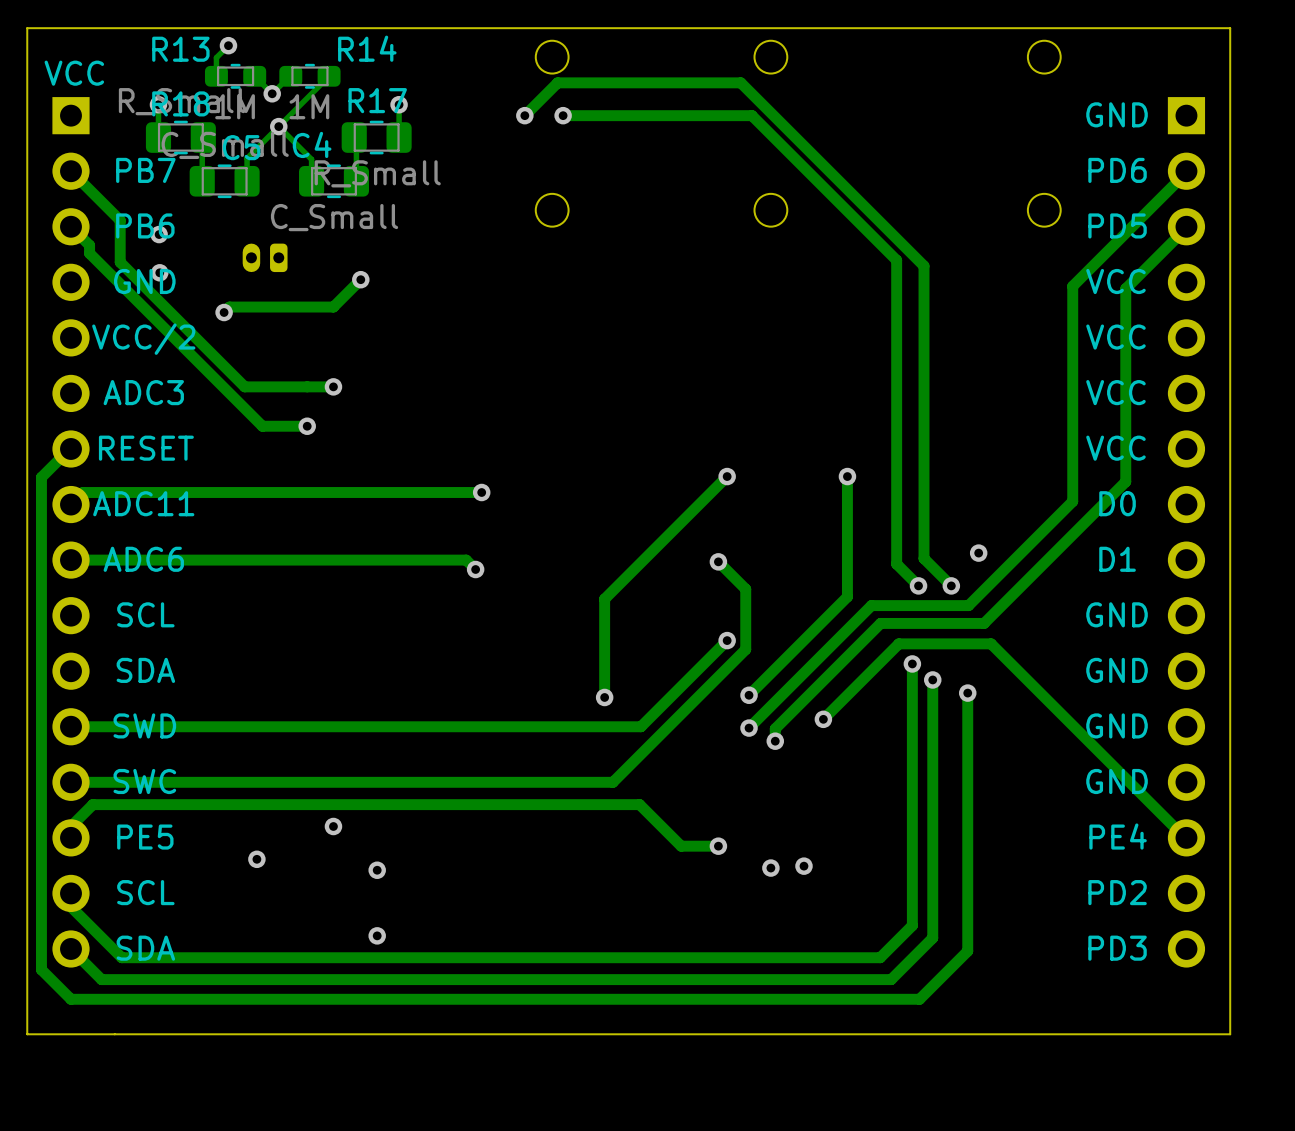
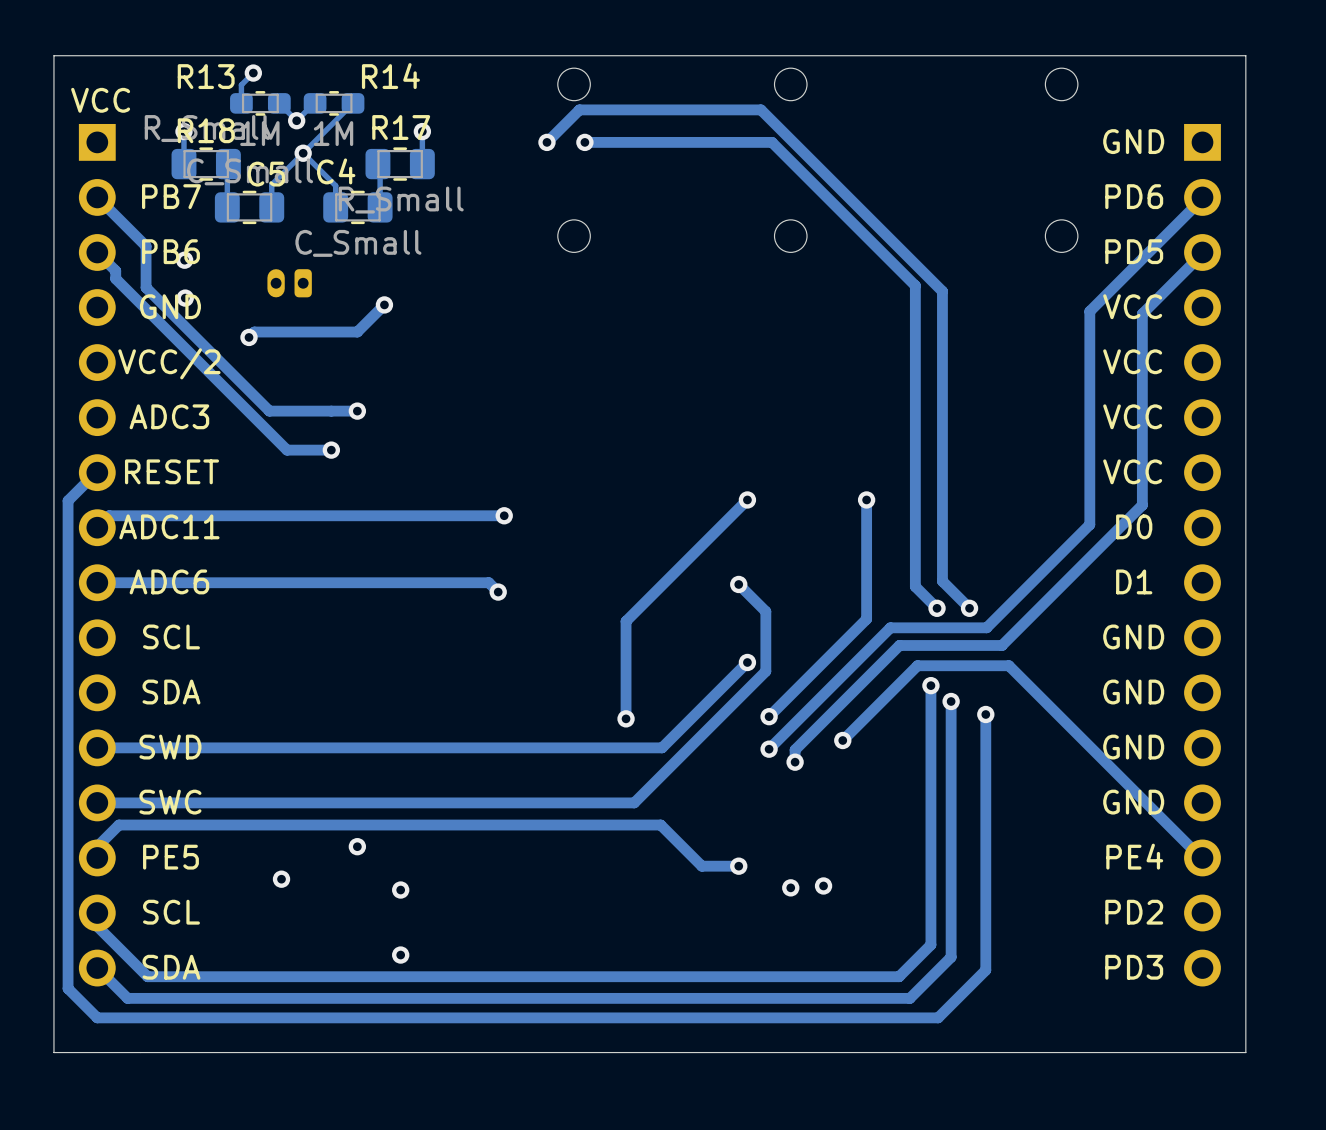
via: (978, 553) -> none

